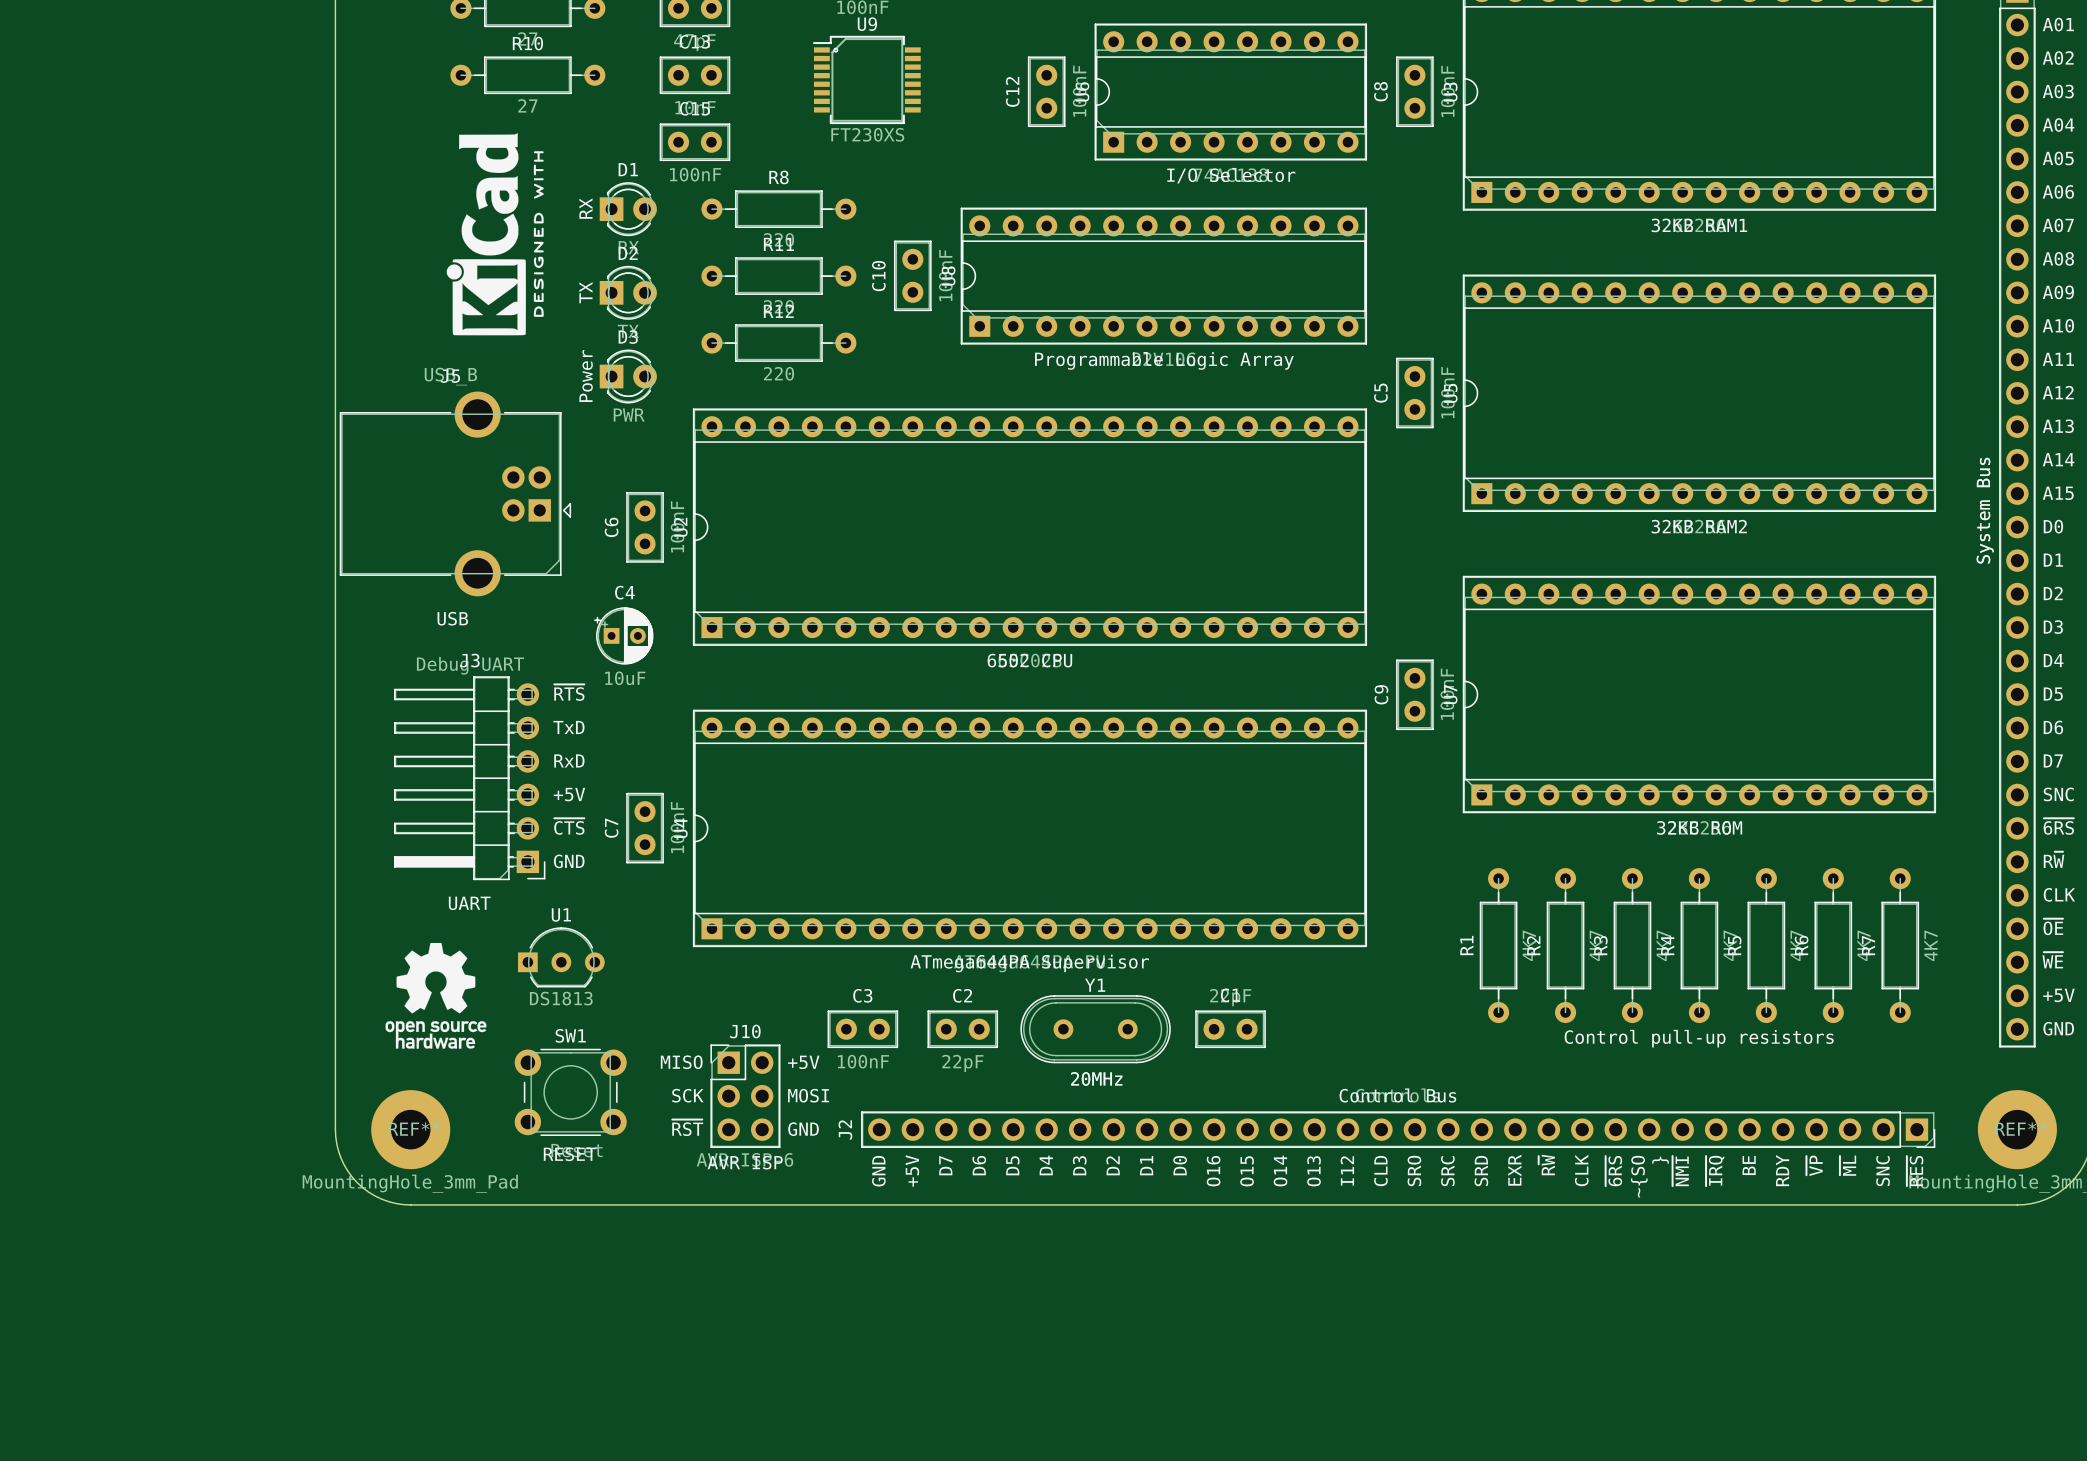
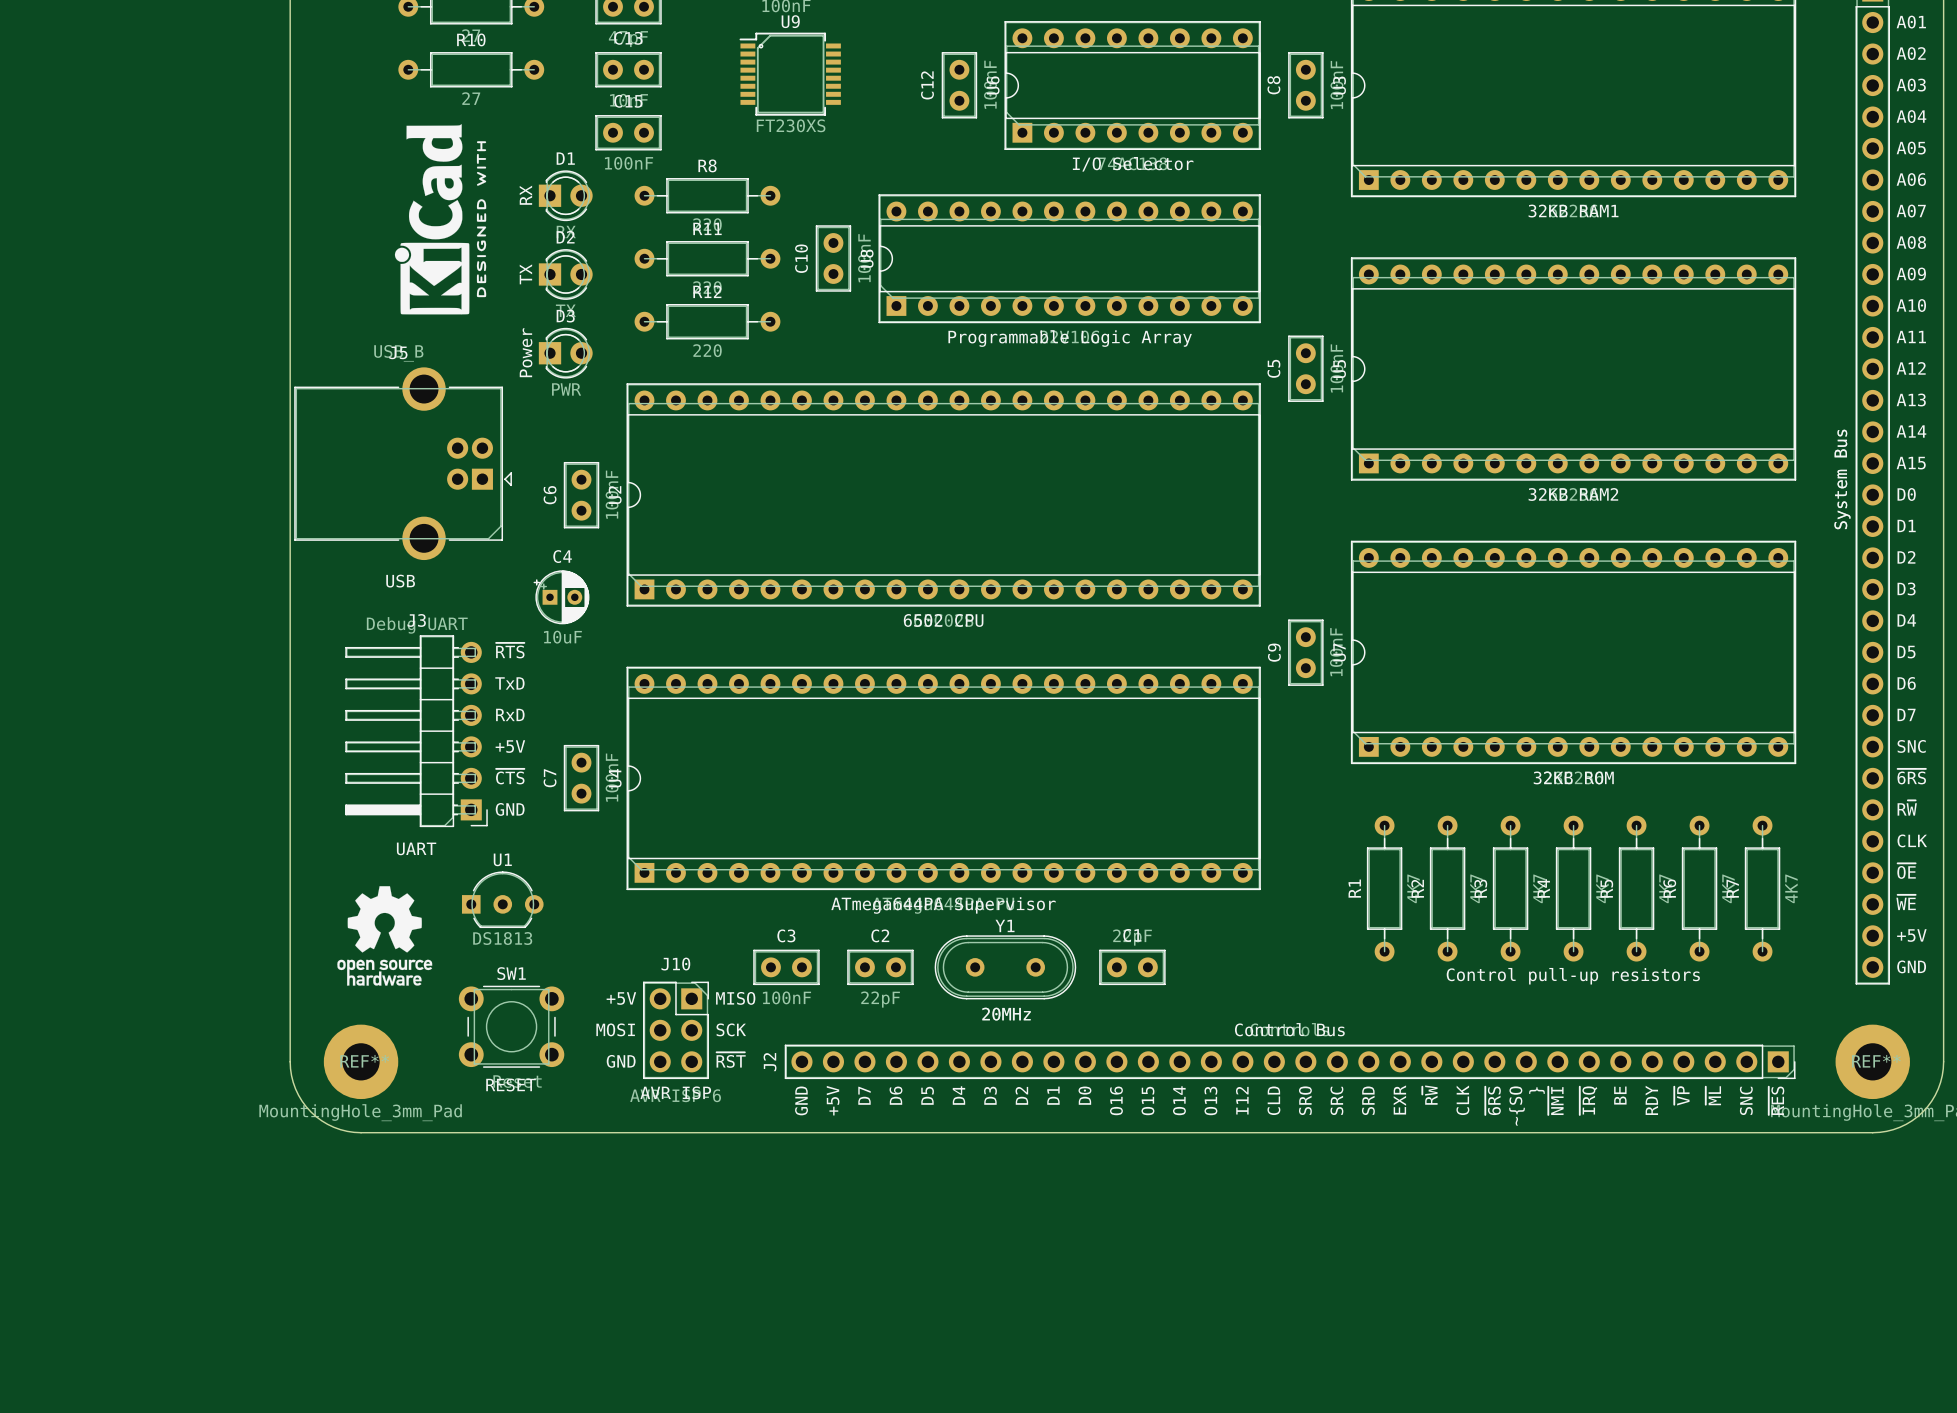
J10 footprint: [710, 1044, 781, 1148] -> [643, 981, 709, 1080]
text: MISO (681, 1062) -> +5V (621, 998)
text: +5V (803, 1062) -> MISO (735, 998)
text: SCK (687, 1095) -> MOSI (615, 1029)
text: MOSI (808, 1095) -> SCK (731, 1029)
text: ~{RST} (687, 1127) -> GND (621, 1061)
text: GND (803, 1129) -> ~{RST} (731, 1060)

